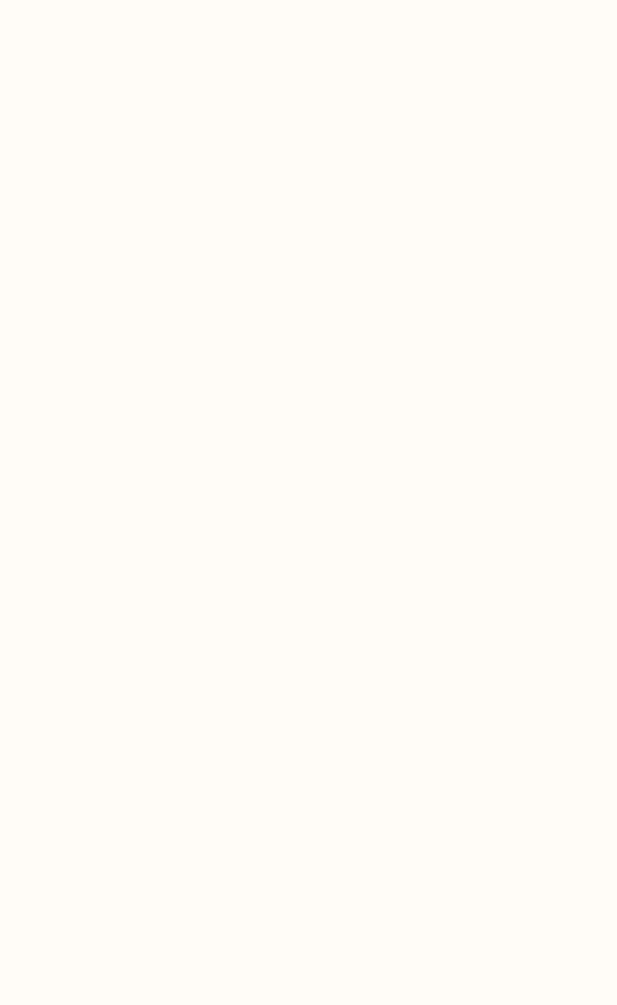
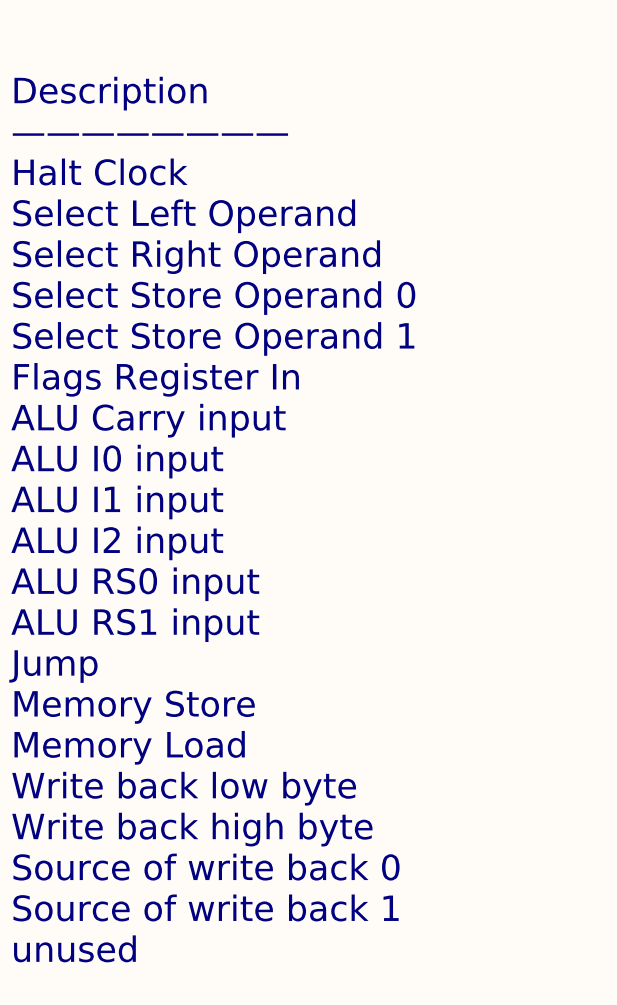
text: none -> Description (110, 93)
text: none -> ———————— (150, 134)
text: none -> Halt Clock (101, 172)
text: none -> Select Left Operand (184, 216)
text: none -> Select Right Operand (196, 257)
text: none -> Select Store Operand 0 (214, 298)
text: none -> Select Store Operand 1 (213, 338)
text: none -> Flags Register In (156, 379)
text: none -> ALU Carry input (148, 420)
text: none -> ALU I0 input (117, 461)
text: none -> ALU I1 input (117, 502)
text: none -> ALU I2 input (117, 543)
text: none -> ALU RS0 input (135, 584)
text: none -> ALU RS1 input (135, 625)
text: none -> Jump (53, 666)
text: none -> Memory Store (134, 707)
text: none -> Memory Load (129, 747)
text: none -> Write back low byte (184, 788)
text: none -> Write back high byte (192, 829)
text: none -> Source of write back 0 (206, 867)
text: none -> Source of write back 1 (206, 907)
text: none -> unused (74, 948)

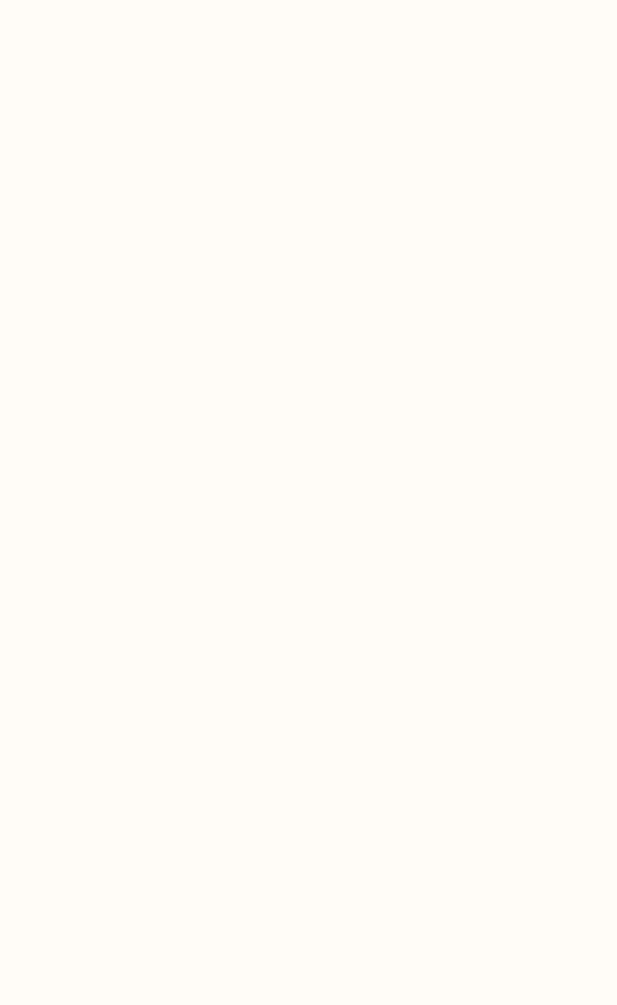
text: Description (110, 93) -> none
text: ———————— (150, 134) -> none
text: Halt Clock (101, 172) -> none
text: Select Left Operand (184, 216) -> none
text: Select Right Operand (196, 257) -> none
text: Select Store Operand 0 (214, 298) -> none
text: Select Store Operand 1 (213, 338) -> none
text: Flags Register In (156, 379) -> none
text: ALU Carry input (148, 420) -> none
text: ALU I0 input (117, 461) -> none
text: ALU I1 input (117, 502) -> none
text: ALU I2 input (117, 543) -> none
text: ALU RS0 input (135, 584) -> none
text: ALU RS1 input (135, 625) -> none
text: Jump (53, 666) -> none
text: Memory Store (134, 707) -> none
text: Memory Load (129, 747) -> none
text: Write back low byte (184, 788) -> none
text: Write back high byte (192, 829) -> none
text: Source of write back 0 (206, 867) -> none
text: Source of write back 1 (206, 907) -> none
text: unused (74, 948) -> none

